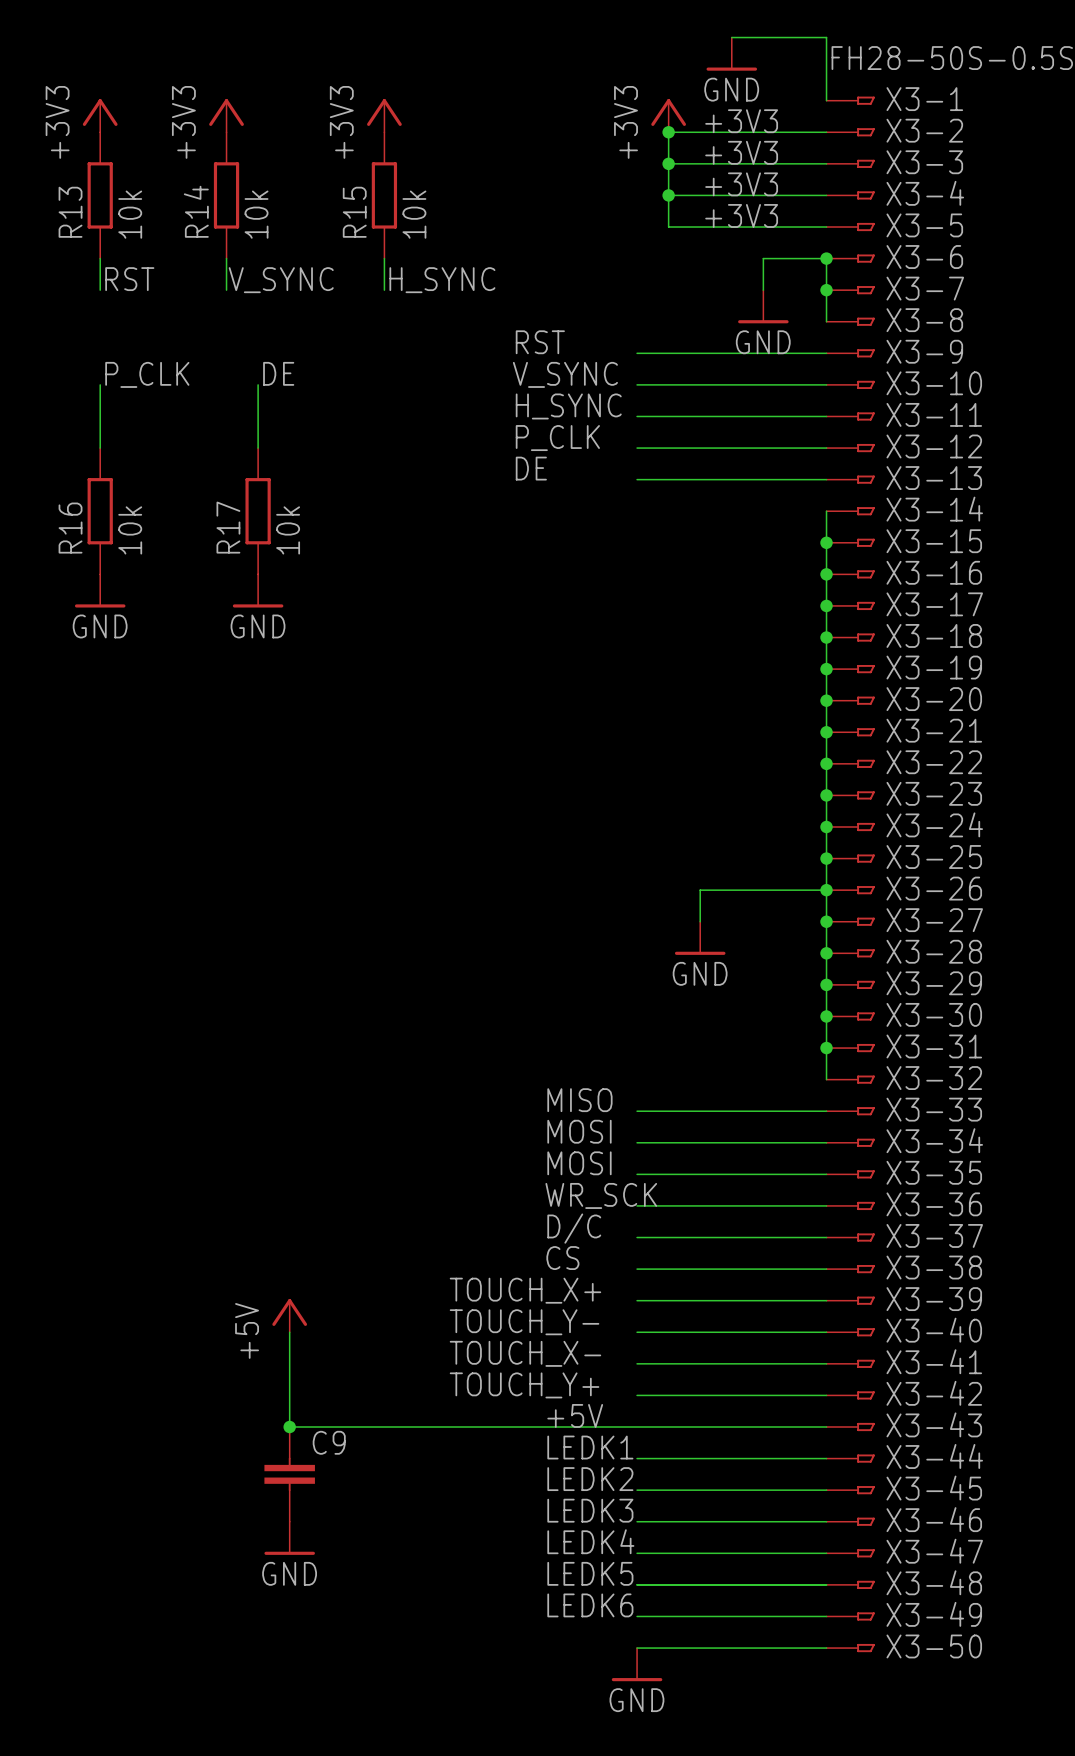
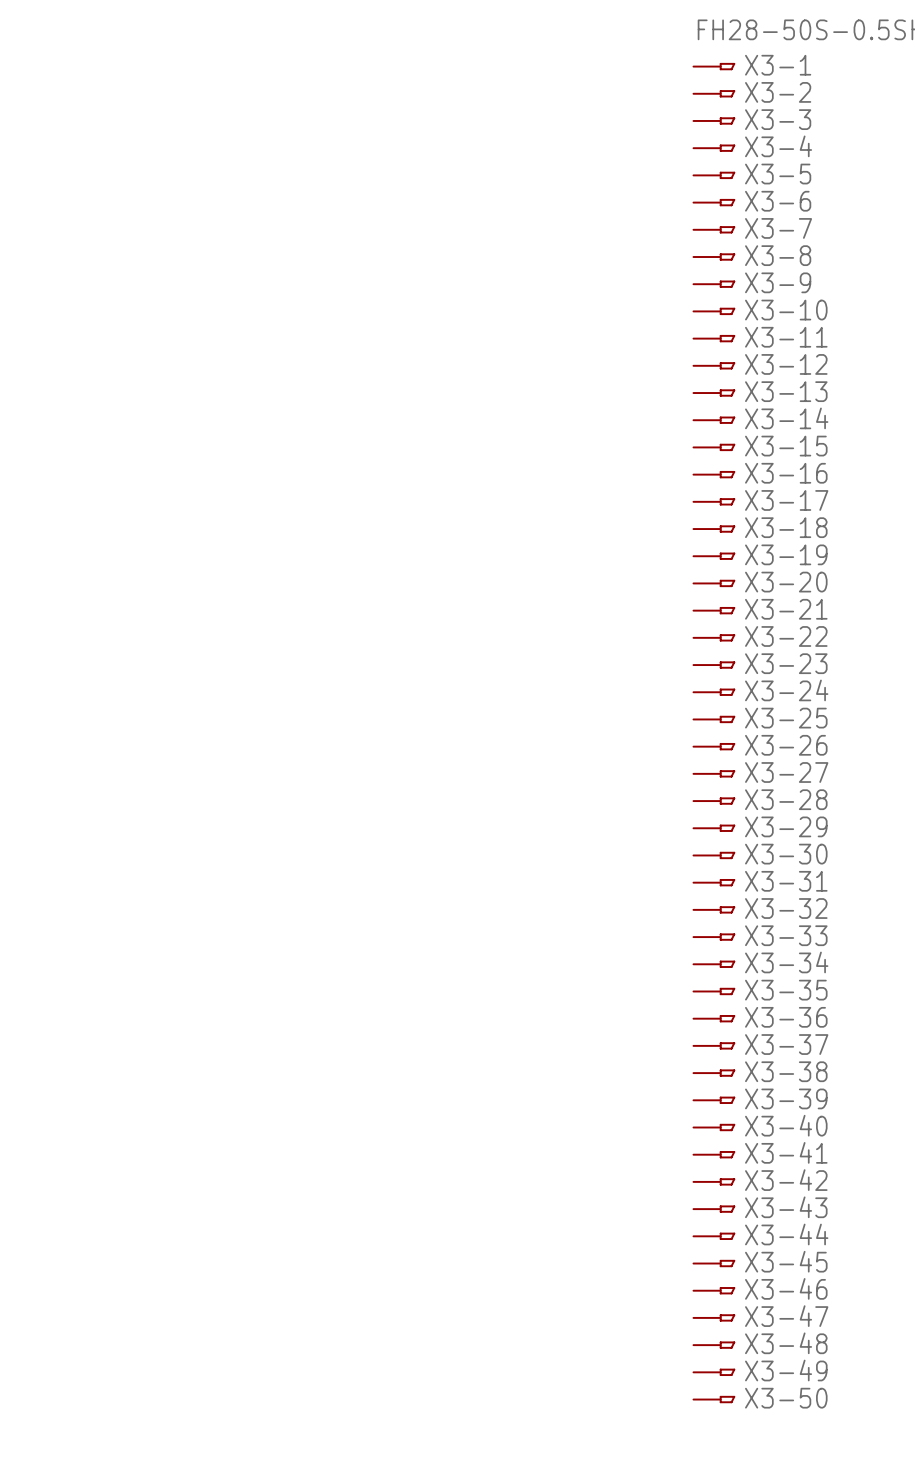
wire: (731, 37) (826, 37) (826, 100) -> none
power symbol: GND (731, 54) -> none
power symbol: +3V3 (100, 115) -> none
power symbol: +3V3 (226, 115) -> none
power symbol: +3V3 (384, 115) -> none
power symbol: +3V3 (668, 115) -> none
label: +3V3 (741, 121) -> none
junction: (668, 132) -> none
wire: (826, 132) (668, 132) (668, 227) (826, 227) -> none
label: +3V3 (741, 152) -> none
wire: (668, 163) (826, 163) -> none
junction: (668, 163) -> none
label: +3V3 (741, 184) -> none
R13: 10k (100, 195) -> none
R14: 10k (226, 195) -> none
R15: 10k (384, 195) -> none
wire: (668, 195) (826, 195) -> none
junction: (668, 195) -> none
label: +3V3 (741, 215) -> none
wire: (100, 258) (100, 290) -> none
wire: (226, 258) (226, 290) -> none
wire: (384, 258) (384, 290) -> none
junction: (826, 258) -> none
label: RST (129, 279) -> none
label: V_SYNC (281, 280) -> none
label: H_SYNC (442, 280) -> none
wire: (763, 290) (763, 258) (826, 258) (826, 321) -> none
junction: (826, 290) -> none
power symbol: GND (763, 306) -> none
label: RST (540, 342) -> none
wire: (637, 353) (826, 353) -> none
label: DE (278, 373) -> none
label: P_CLK (147, 374) -> none
label: V_SYNC (565, 374) -> none
wire: (100, 384) (100, 448) -> none
wire: (258, 384) (258, 448) -> none
wire: (637, 384) (826, 384) -> none
label: H_SYNC (568, 406) -> none
wire: (637, 416) (826, 416) -> none
label: P_CLK (557, 438) -> none
wire: (637, 448) (826, 448) -> none
label: DE (531, 468) -> none
wire: (637, 479) (826, 479) -> none
R16: 10k (100, 511) -> none
R17: 10k (258, 511) -> none
wire: (826, 511) (826, 1079) -> none
junction: (826, 542) -> none
junction: (826, 574) -> none
power symbol: GND (100, 590) -> none
power symbol: GND (258, 590) -> none
junction: (826, 605) -> none
junction: (826, 637) -> none
junction: (826, 669) -> none
junction: (826, 700) -> none
junction: (826, 732) -> none
junction: (826, 763) -> none
junction: (826, 795) -> none
junction: (826, 827) -> none
junction: (826, 858) -> none
wire: (826, 890) (700, 890) (700, 921) -> none
junction: (826, 890) -> none
junction: (826, 921) -> none
power symbol: GND (700, 938) -> none
junction: (826, 953) -> none
junction: (826, 984) -> none
junction: (826, 1016) -> none
junction: (826, 1048) -> none
label: MISO (579, 1100) -> none
wire: (637, 1111) (826, 1111) -> none
label: MOSI (579, 1131) -> none
wire: (637, 1142) (826, 1142) -> none
label: MOSI (579, 1163) -> none
wire: (637, 1174) (826, 1174) -> none
label: WR_SCK (601, 1195) -> none
wire: (637, 1205) (826, 1205) -> none
label: D/C (574, 1228) -> none
wire: (637, 1237) (826, 1237) -> none
label: CS (562, 1258) -> none
wire: (637, 1269) (826, 1269) -> none
label: TOUCH_X+ (525, 1290) -> none
wire: (637, 1300) (826, 1300) -> none
power symbol: +5V (289, 1315) -> none
label: TOUCH_Y- (524, 1322) -> none
wire: (289, 1332) (289, 1426) (826, 1426) -> none
wire: (637, 1332) (826, 1332) -> none
label: TOUCH_X- (525, 1353) -> none
wire: (637, 1363) (826, 1363) -> none
label: TOUCH_Y+ (524, 1385) -> none
wire: (637, 1395) (826, 1395) -> none
label: +5V (575, 1415) -> none
junction: (289, 1426) -> none
label: LEDK1 (590, 1447) -> none
wire: (637, 1458) (826, 1458) -> none
C9: (289, 1474) -> none
label: LEDK2 (590, 1479) -> none
wire: (637, 1490) (826, 1490) -> none
label: LEDK3 (590, 1510) -> none
wire: (637, 1521) (826, 1521) -> none
power symbol: GND (289, 1538) -> none
label: LEDK4 (590, 1541) -> none
wire: (637, 1553) (826, 1553) -> none
label: LEDK5 (590, 1573) -> none
wire: (637, 1584) (826, 1584) -> none
label: LEDK6 (590, 1605) -> none
wire: (637, 1616) (826, 1616) -> none
wire: (637, 1648) (826, 1648) -> none
power symbol: GND (637, 1664) -> none

